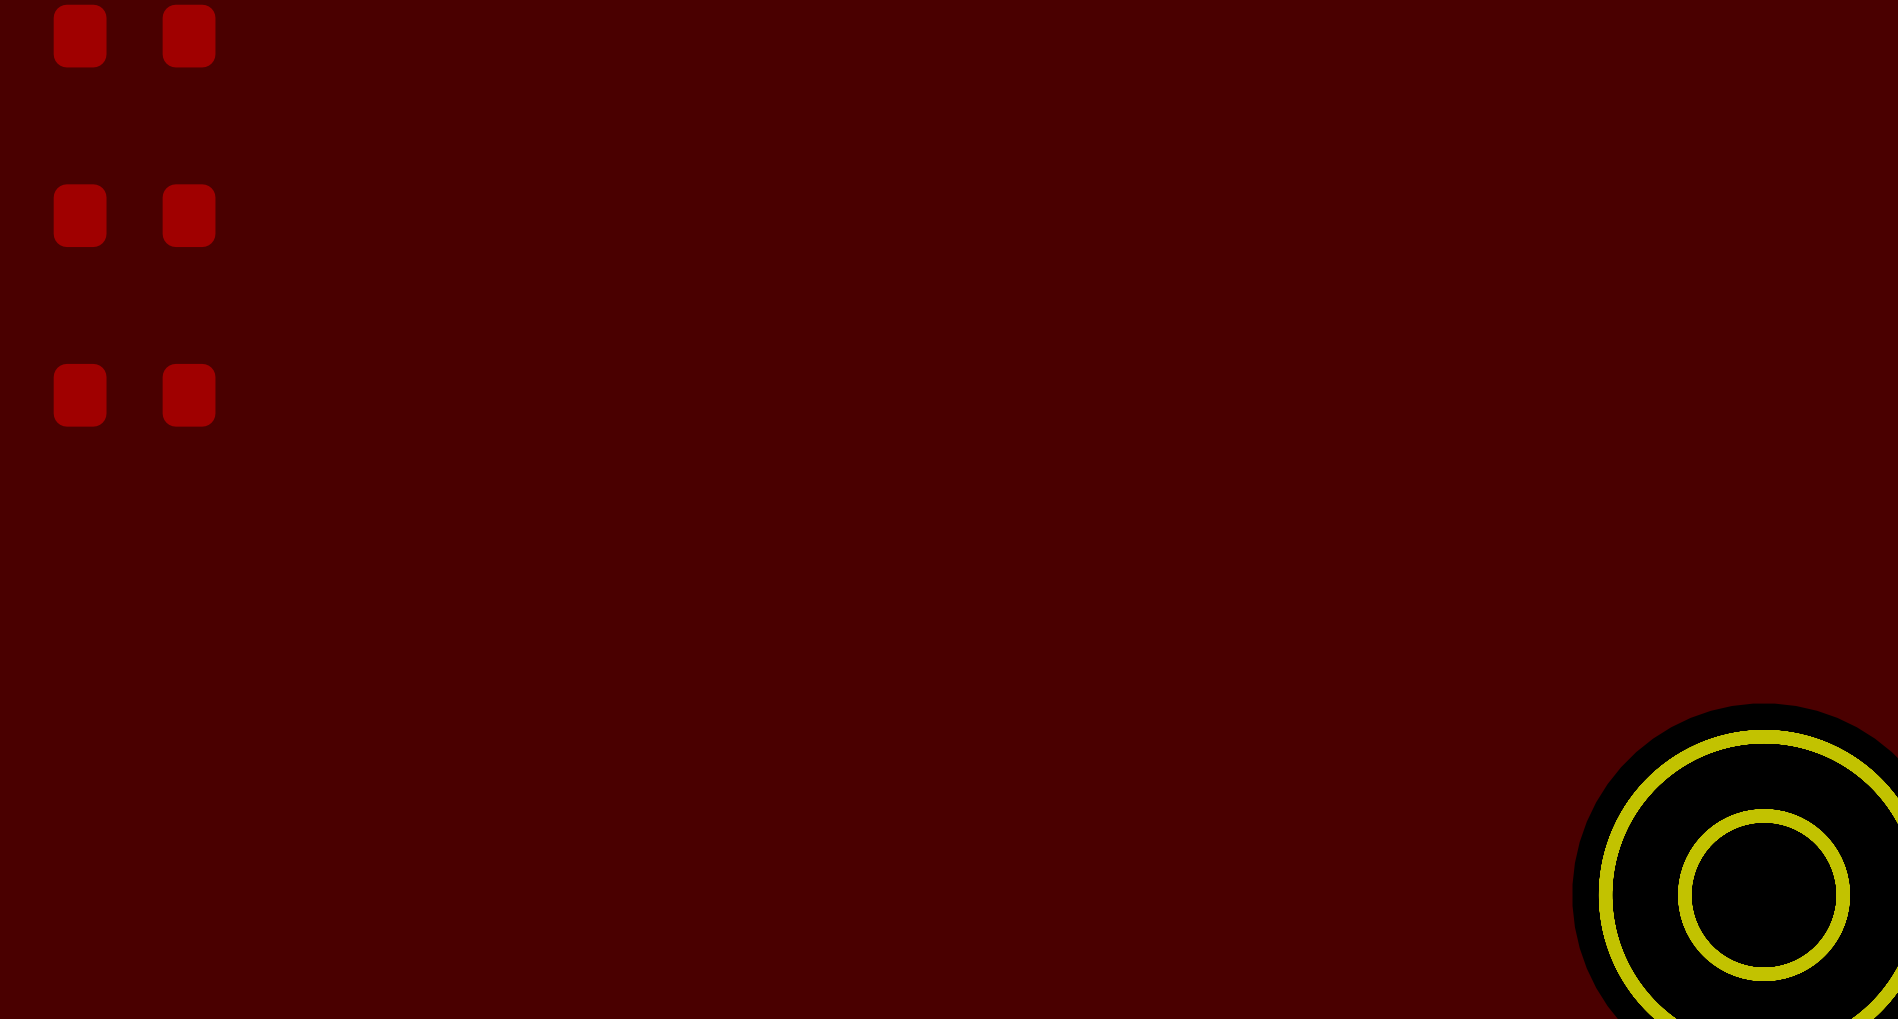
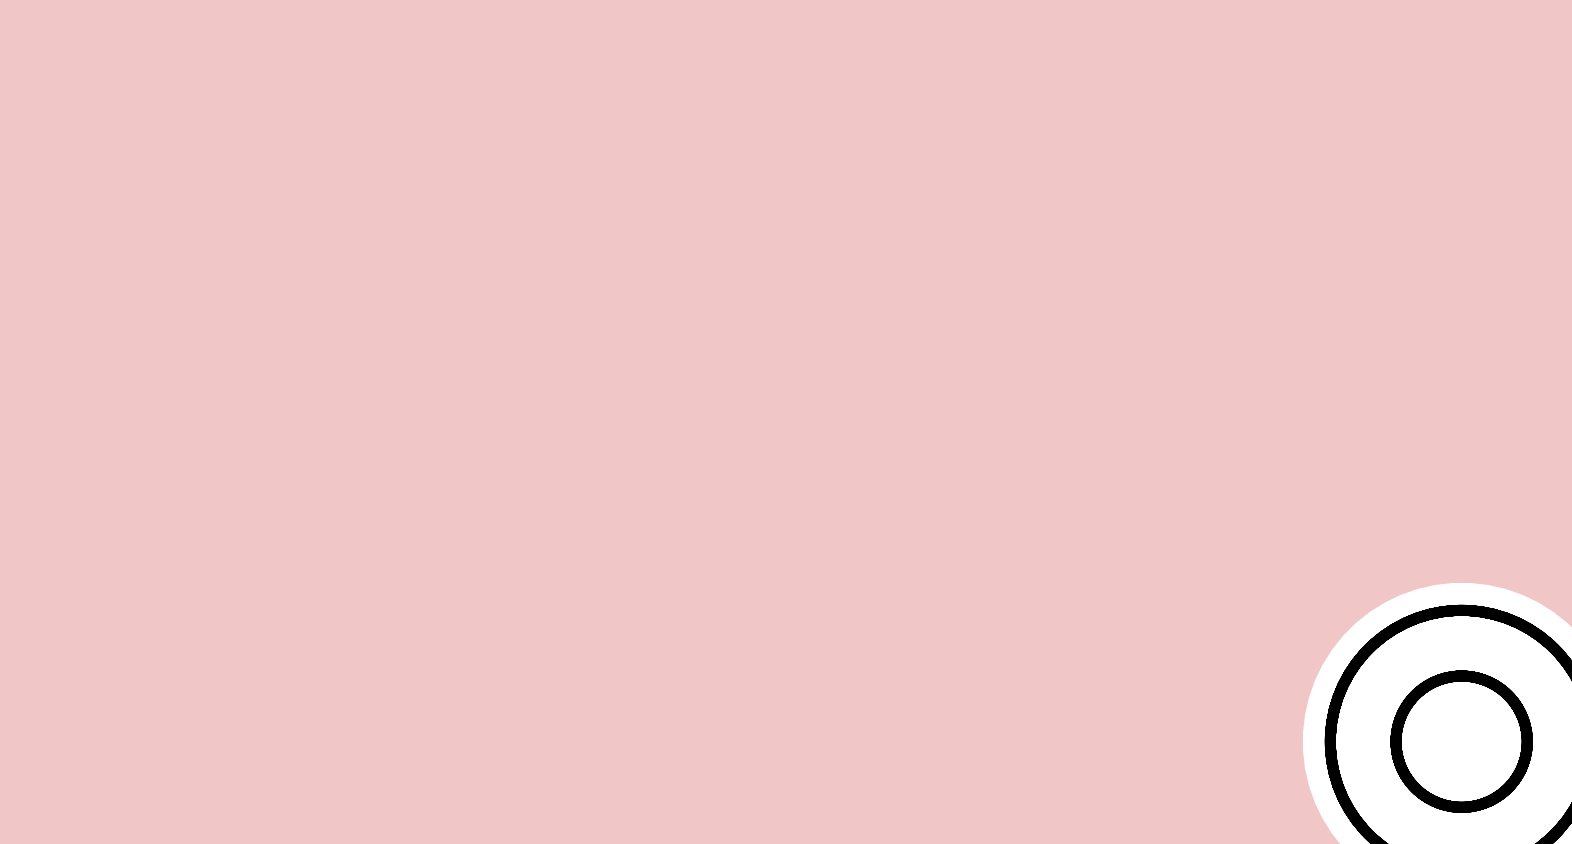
part: (134, 36) -> none
part: (134, 215) -> none
part: (134, 395) -> none

